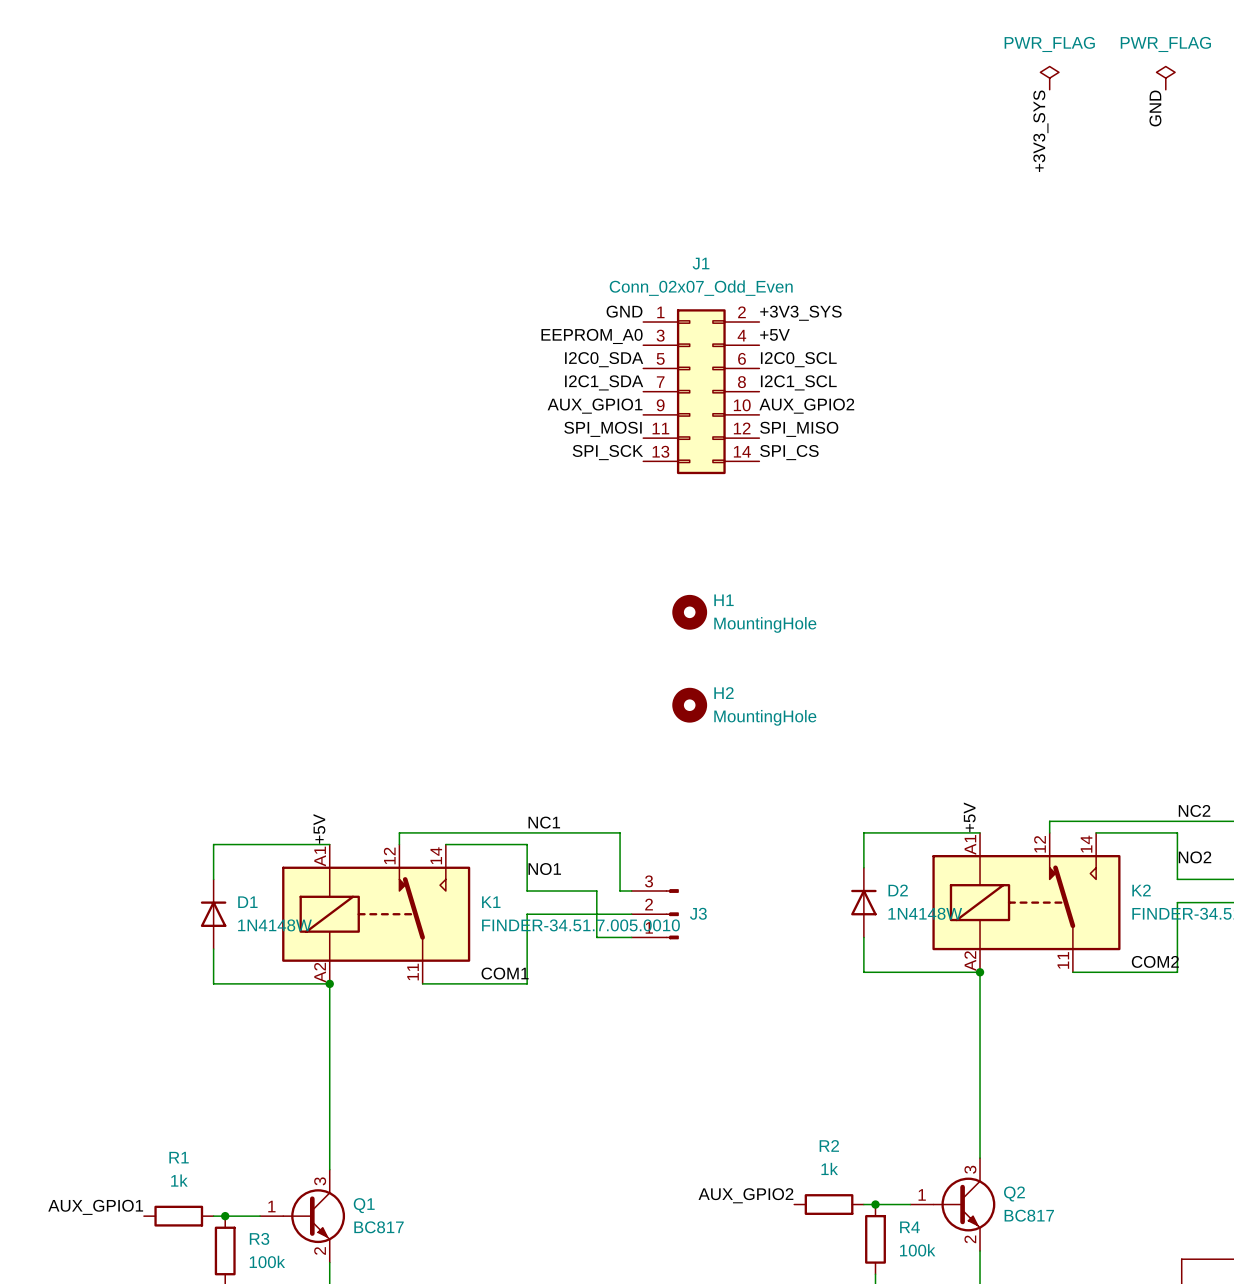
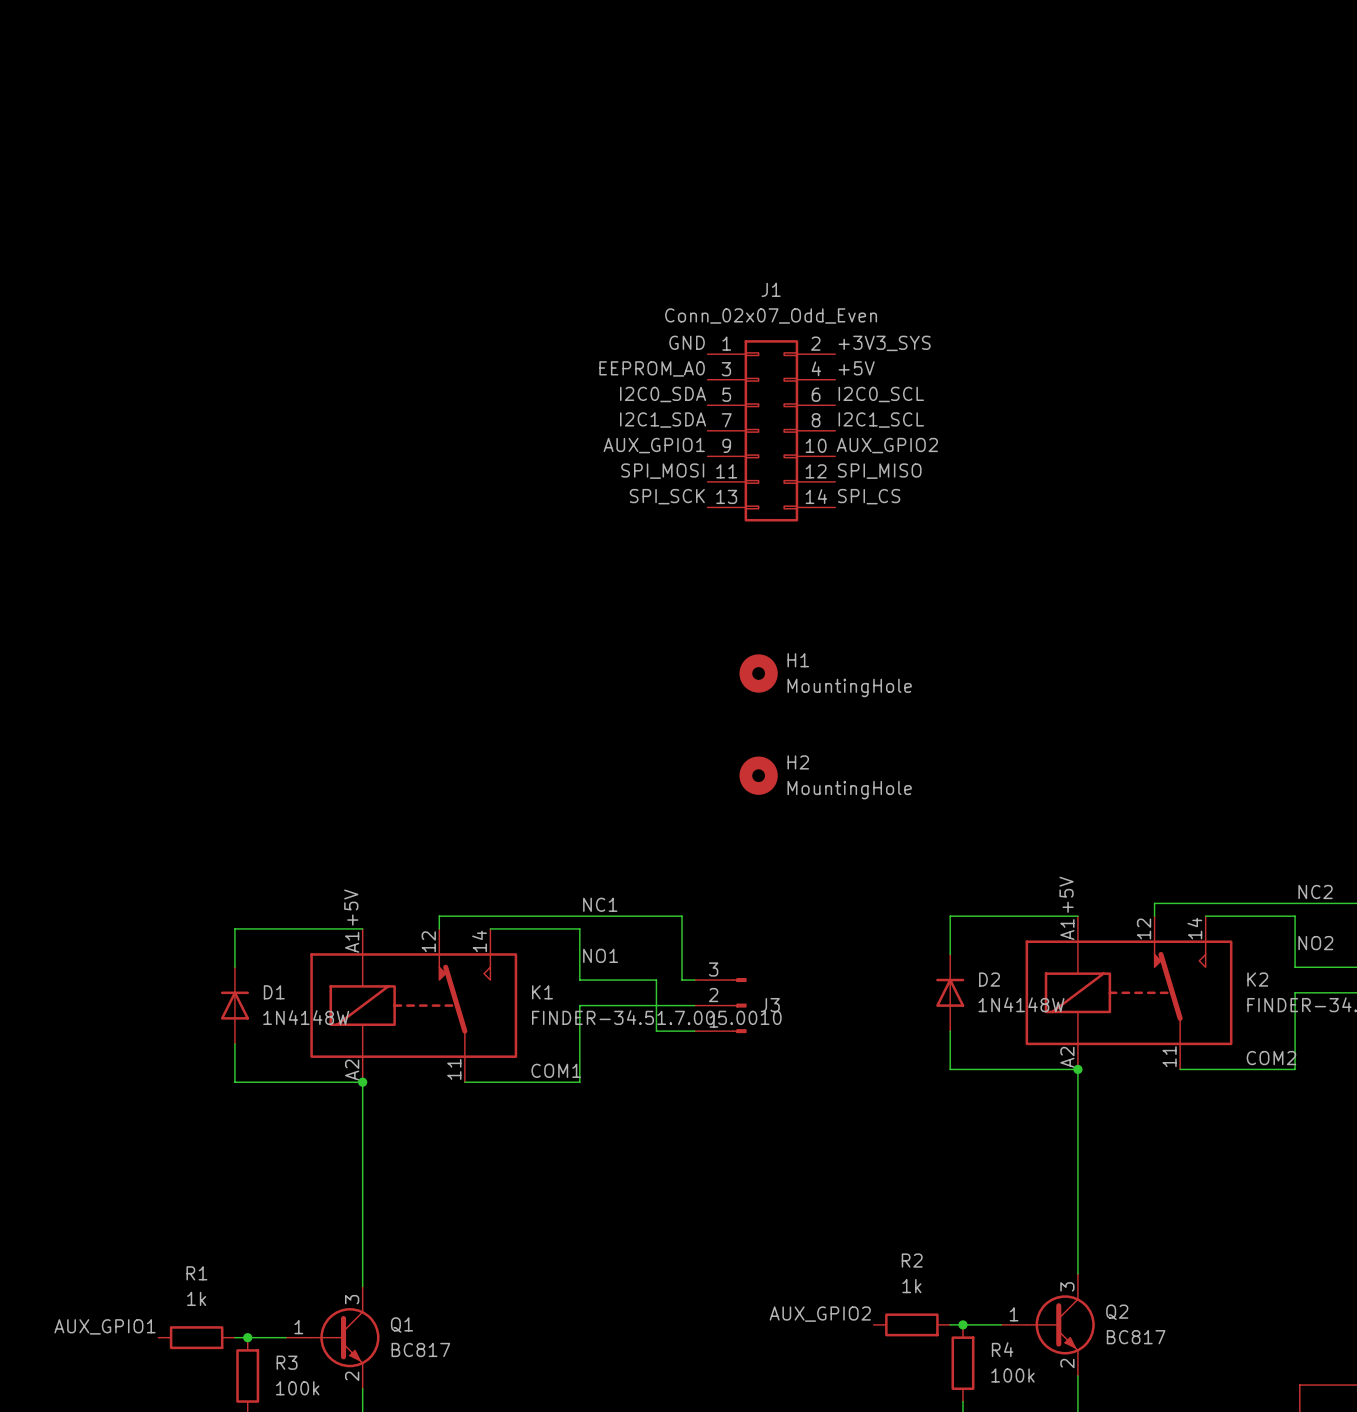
power symbol: PWR_FLAG (1049, 78) -> none
power symbol: PWR_FLAG (1165, 78) -> none
label: GND (1155, 108) -> none
label: +3V3_SYS (1040, 131) -> none

